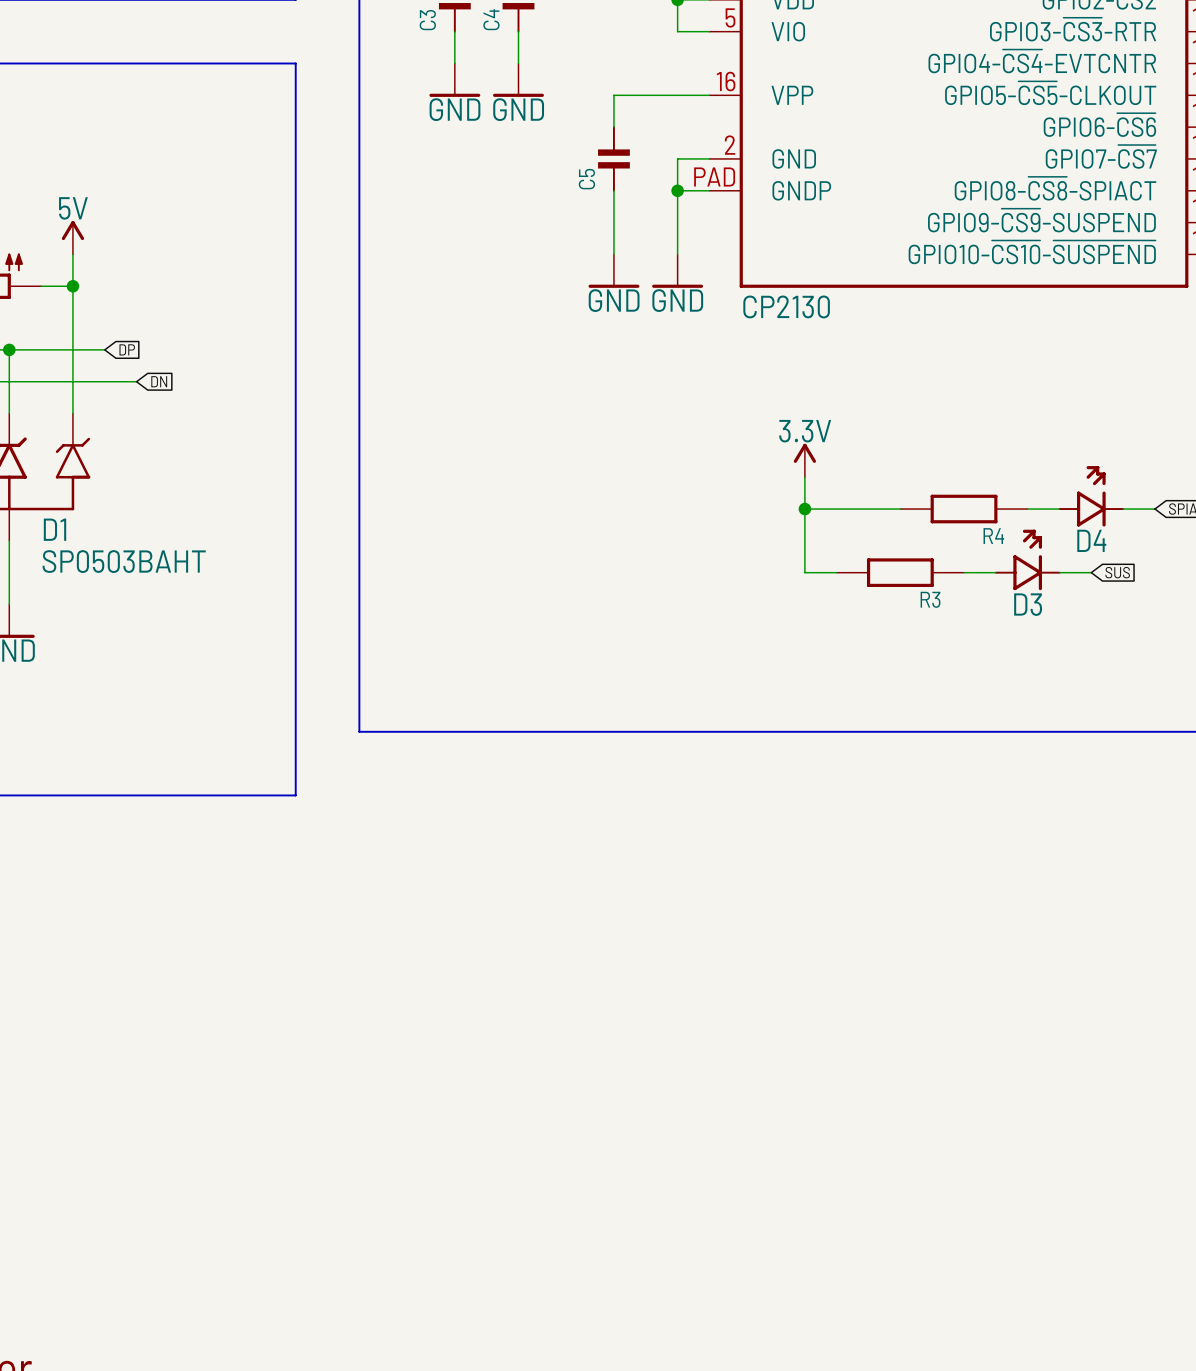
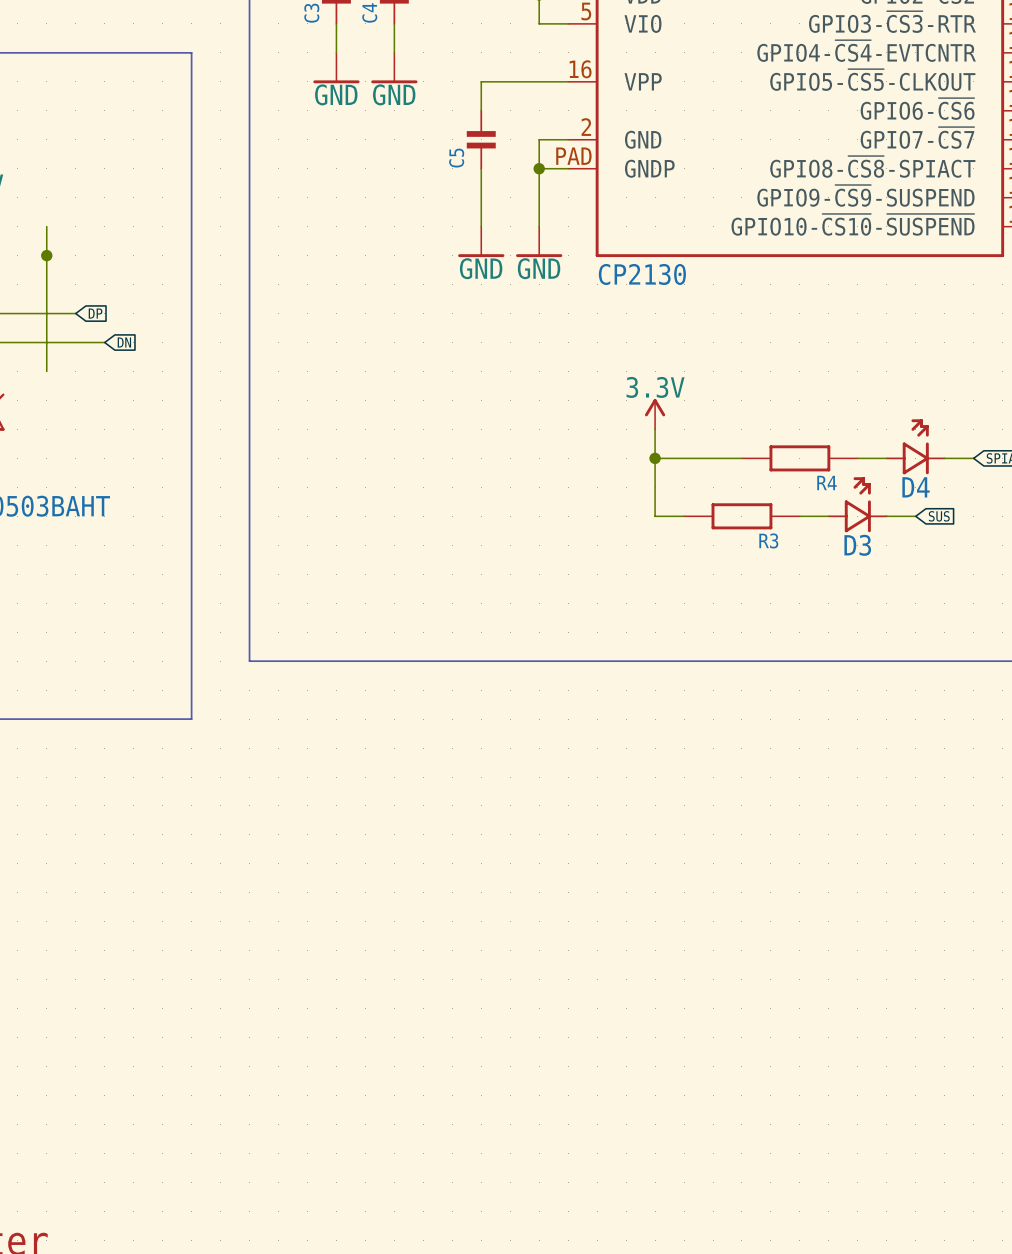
wire: none -> (46, 226) (46, 371)
junction: none -> (46, 255)
wire: none -> (17, 313) (75, 313)
global label position: DP (127, 349) -> DP (95, 313)
wire: none -> (46, 342) (104, 342)
global label position: DN (159, 381) -> DN (124, 342)

